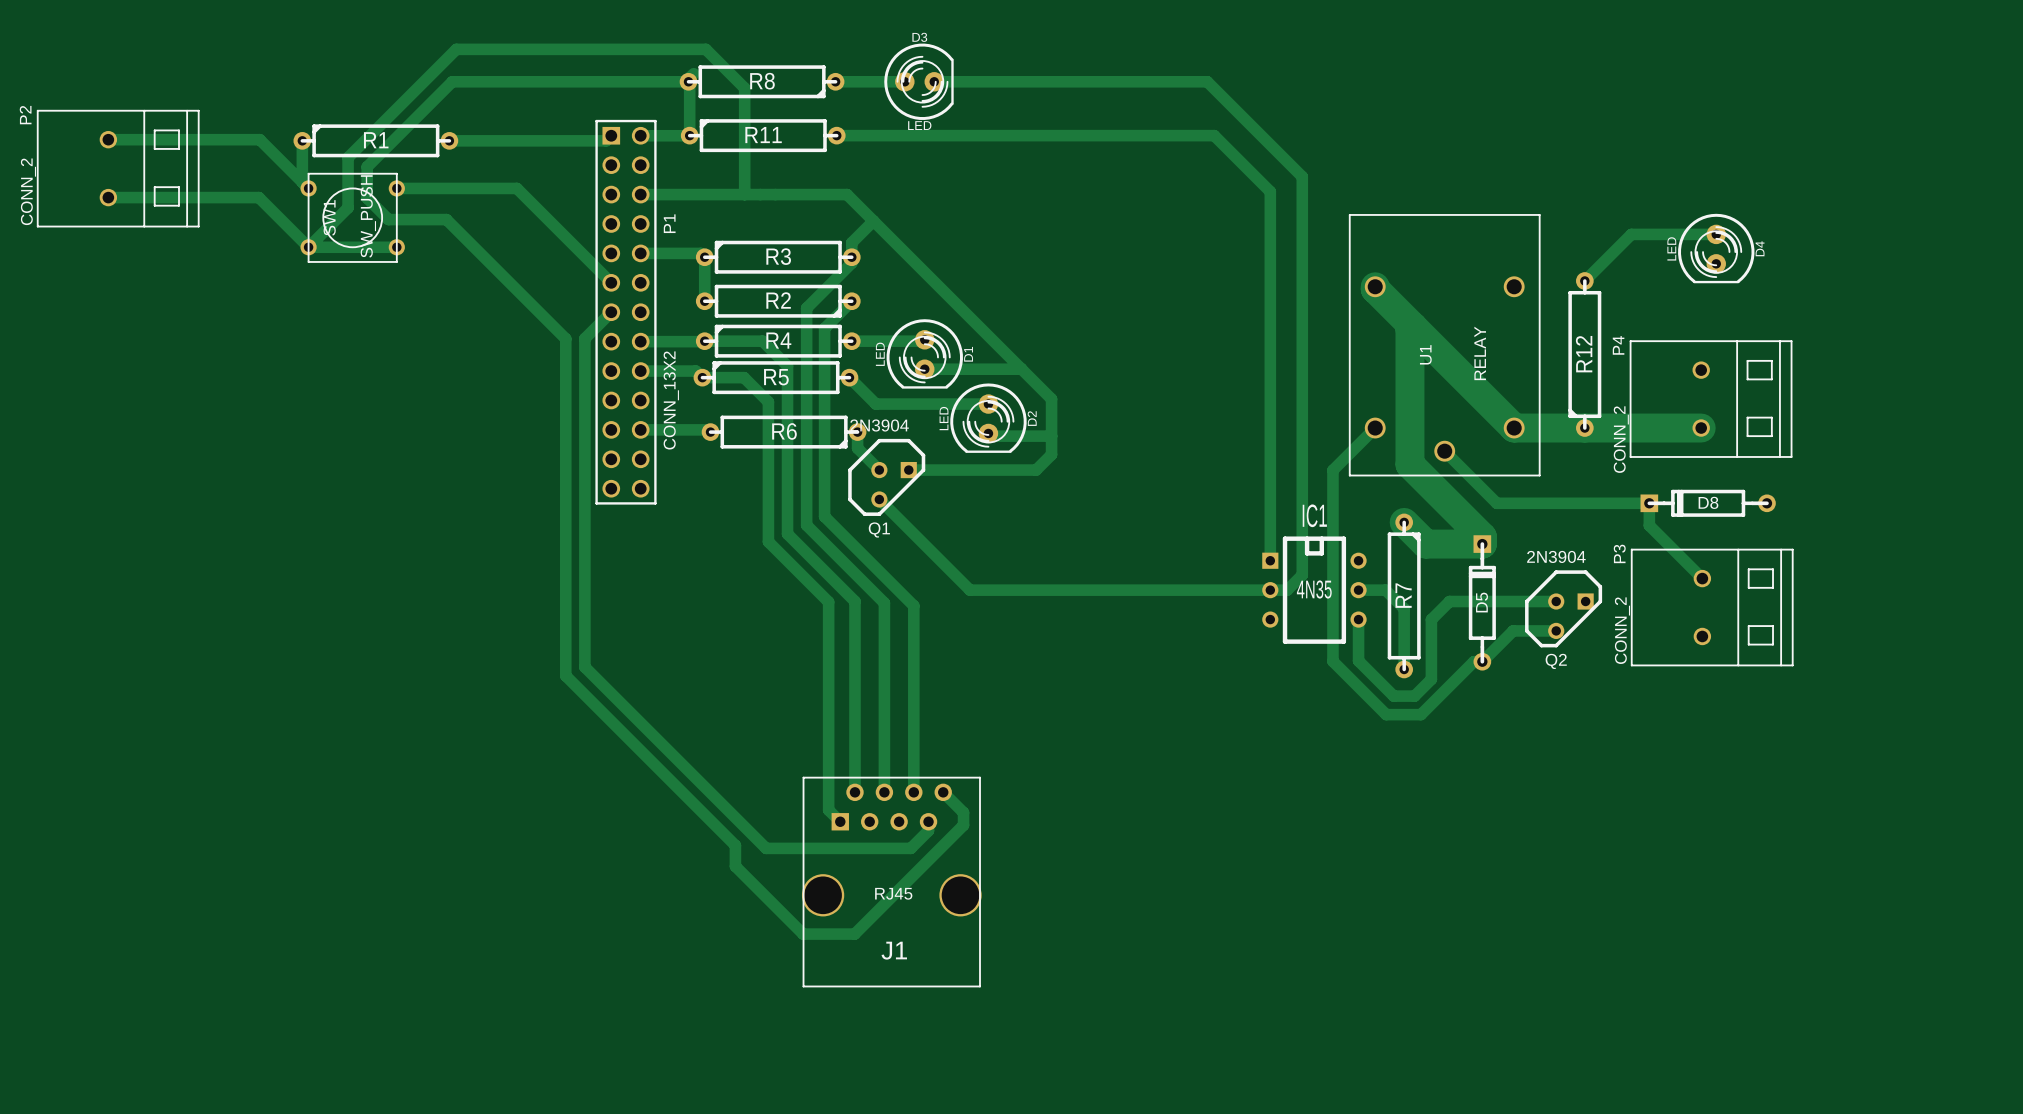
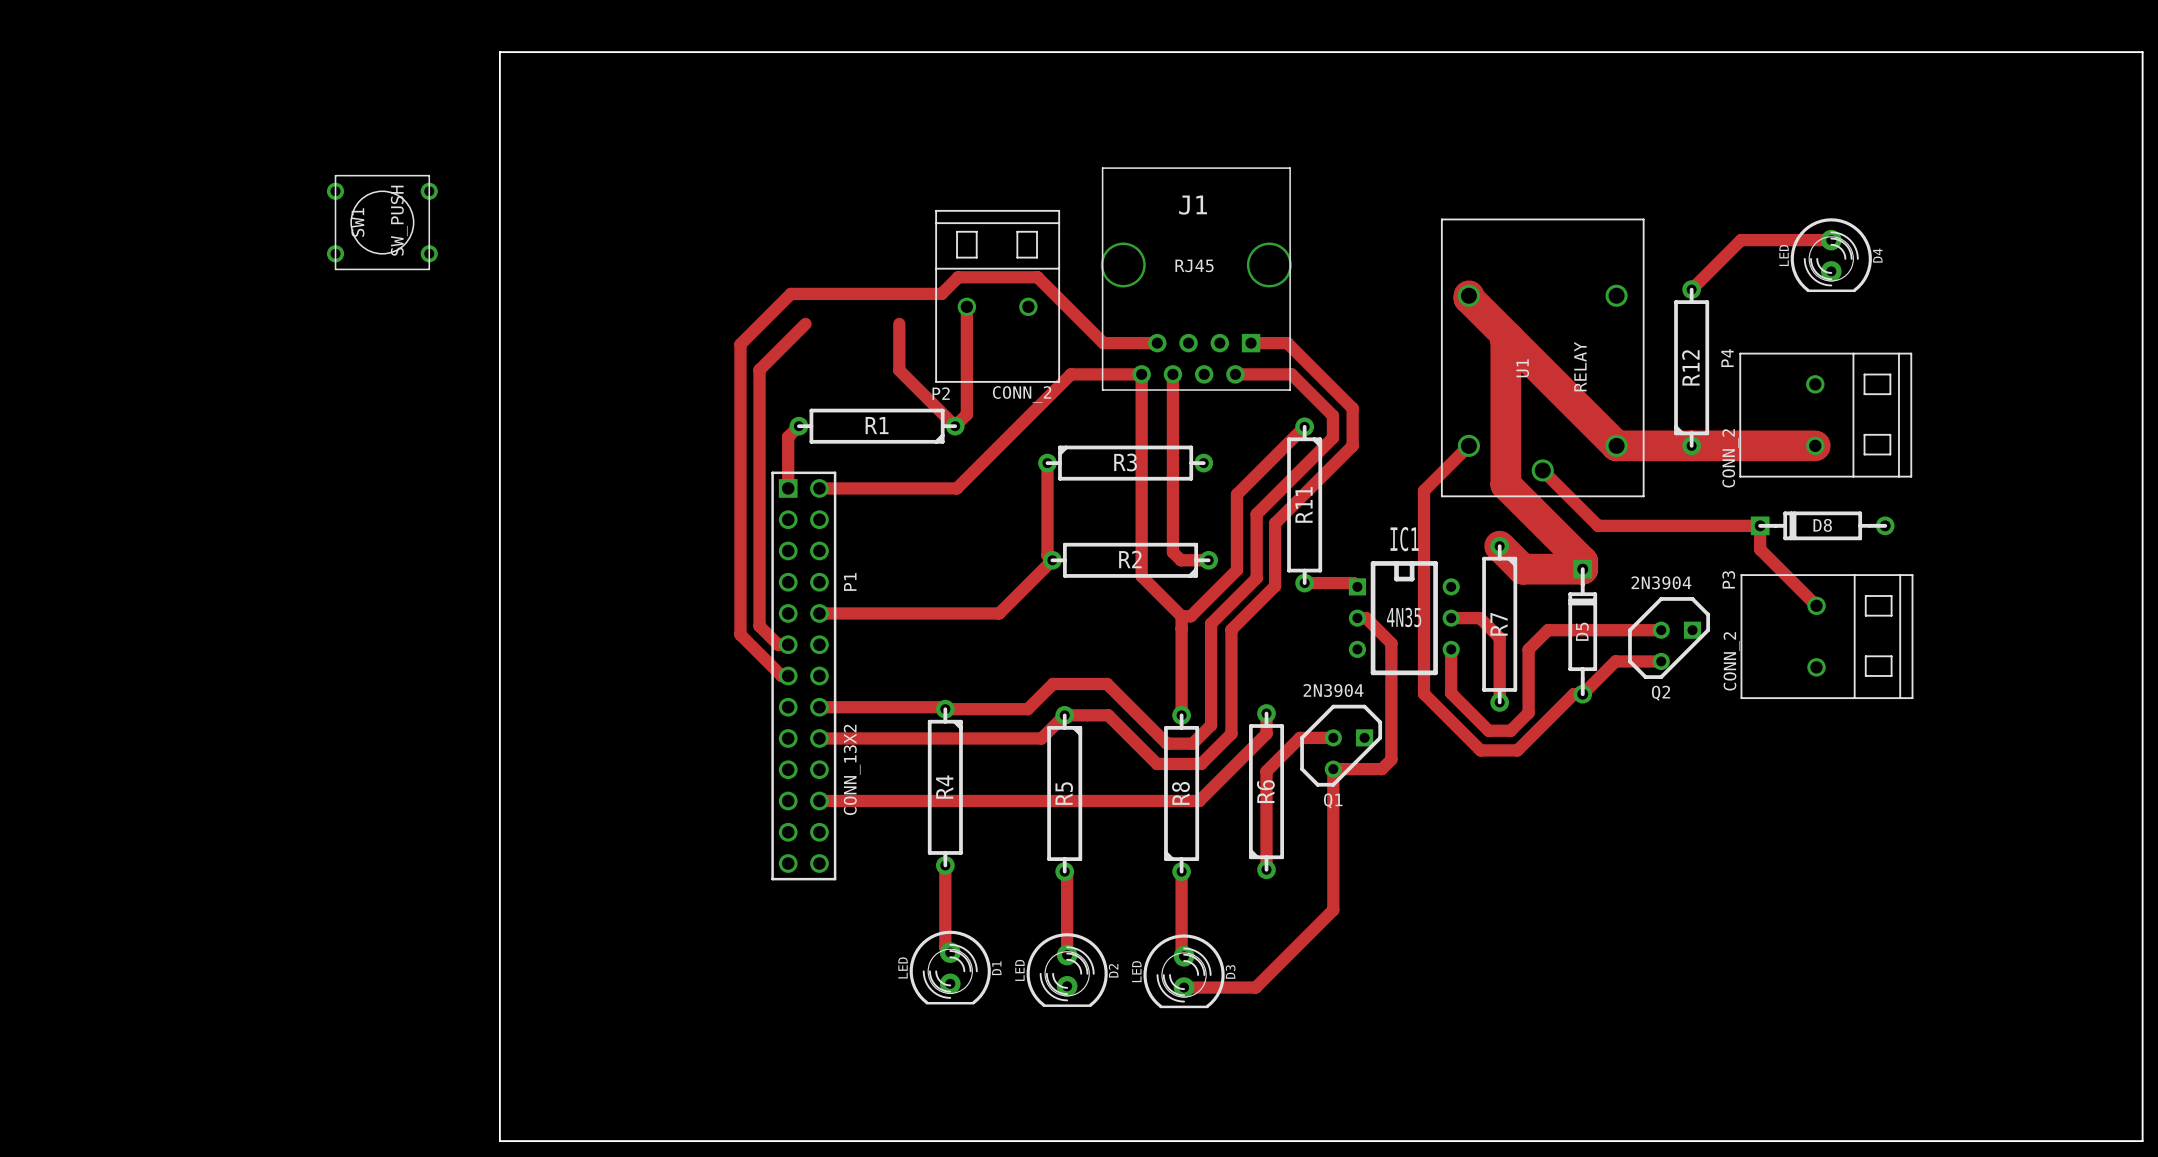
board edge: none -> (499, 52) (499, 1141) (2142, 1141) (2142, 52) (499, 52)
track: (693, 73) (689, 77) (689, 135) -> none
track: (688, 81) (452, 81) (367, 166) (367, 198) (388, 219) (446, 219) (565, 338) (565, 675) (735, 845) (735, 866) (803, 934) (854, 934) (963, 825) (963, 812) (943, 792) -> none
R8 rotation: 0° (762, 81) -> 90° clockwise (1181, 793)
R8 position: (762, 81) -> (1181, 793)
track: (835, 81) (904, 81) -> none
D3 rotation: 0° (918, 81) -> 90° clockwise (1184, 971)
D3 position: (918, 81) -> (1184, 971)
track: (934, 81) (1207, 81) (1302, 176) (1302, 575) (1287, 590) (1278, 590) -> (1184, 987) (1255, 987) (1333, 910) (1333, 769) (1381, 769) (1391, 759) (1391, 643) (1366, 618)
track: (611, 135) (606, 140) (449, 140) -> none
track: (640, 135) (689, 135) -> none
R11 rotation: 0° (763, 135) -> 90° clockwise (1304, 504)
R11 position: (763, 135) -> (1304, 504)
track: (836, 135) (1214, 135) (1270, 191) (1270, 560) -> (1304, 583) (1353, 583) (1357, 586)
track: (108, 139) (259, 139) (308, 188) -> none
track: (302, 140) (302, 182) -> none
R1 rotation: 0° (375, 140) -> 180° (877, 426)
R1 position: (375, 140) -> (877, 426)
P2 rotation: 0° (118, 168) -> 90° counterclockwise (997, 296)
P2 position: (118, 168) -> (997, 296)
track: (396, 188) (516, 188) (611, 282) -> none
track: (640, 194) (847, 194) (1051, 399) (1051, 454) (1036, 470) (908, 470) -> none
track: (744, 194) (744, 88) (705, 49) (456, 49) (348, 157) (348, 207) (308, 247) -> none
track: (108, 197) (258, 197) (308, 247) -> none
track: (873, 221) (851, 242) (851, 263) (806, 308) (806, 525) (884, 603) (884, 792) -> none
track: (308, 247) (396, 247) -> none
track: (640, 253) (700, 253) (704, 257) (704, 301) -> none
R3 position: (778, 257) -> (1125, 463)
track: none -> (966, 306) (966, 414) (955, 426) (899, 370) (899, 323)
R2 position: (778, 301) -> (1130, 560)
track: (851, 301) (824, 328) (824, 516) (913, 605) (913, 792) -> none
track: (611, 312) (584, 338) (584, 667) (766, 848) (910, 848) (928, 830) (928, 821) -> none
P1 position: (625, 312) -> (803, 675)
track: none -> (805, 323) (759, 369) (759, 626) (778, 644) (788, 644)
track: none -> (1157, 343) (1103, 343) (1037, 277) (958, 277) (941, 293) (790, 293) (740, 344) (740, 634) (781, 675) (788, 675)
track: none -> (1251, 343) (1287, 343) (1352, 408) (1352, 445) (1275, 523) (1275, 586) (1231, 629) (1231, 733) (1201, 763) (1156, 763) (1108, 715) (1064, 715) (1041, 738) (819, 738)
track: (924, 339) (851, 341) -> none
track: (640, 341) (762, 341) (787, 366) (787, 533) (854, 601) (854, 792) -> none
R4 rotation: 0° (778, 341) -> 90° clockwise (945, 787)
R4 position: (778, 341) -> (945, 787)
D1 position: (924, 353) -> (950, 967)
track: none -> (1172, 374) (1172, 552) (1180, 560) (1208, 560)
track: none -> (1235, 374) (1291, 374) (1332, 415) (1332, 437) (1256, 514) (1256, 578) (1211, 623) (1211, 725) (1192, 743) (1166, 743) (1107, 683) (1053, 683) (1027, 709) (819, 707)
track: (924, 369) (1021, 369) -> none
track: (640, 371) (695, 371) (702, 377) (744, 377) (768, 401) (768, 541) (828, 602) (828, 810) (840, 821) -> none
R5 rotation: 0° (775, 377) -> 90° clockwise (1064, 793)
R5 position: (775, 377) -> (1064, 793)
track: (849, 377) (875, 404) (988, 404) -> none
track: none -> (798, 426) (788, 436) (788, 488)
track: none -> (1304, 426) (1236, 494) (1236, 570) (1190, 616) (1181, 616)
D2 position: (988, 418) -> (1067, 970)
track: (640, 429) (708, 429) (710, 432) -> none
R6 rotation: 0° (784, 432) -> 90° clockwise (1266, 791)
R6 position: (784, 432) -> (1266, 791)
track: (857, 432) (857, 448) (879, 470) -> none
track: (988, 433) (991, 436) (1051, 436) -> none
track: none -> (1047, 463) (1047, 555) (1052, 560) (999, 613) (819, 613)
track: none -> (819, 488) (956, 488) (1070, 374) (1141, 374) (1141, 576) (1181, 616)
Q1 position: (886, 477) -> (1341, 745)
track: (879, 499) (970, 590) (1270, 590) -> none
track: none -> (1181, 616) (1181, 715)
track: none -> (1266, 713) (1266, 733) (1199, 800) (819, 800)
track: none -> (1333, 737) (1299, 737) (1266, 771) (1266, 869)
track: none -> (945, 865) (945, 947) (950, 952)
track: none -> (1064, 871) (1067, 874) (1067, 955)
track: none -> (1181, 871) (1181, 953) (1184, 956)
J1 rotation: 0° (891, 882) -> 180° (1196, 279)
J1 position: (891, 882) -> (1196, 279)

